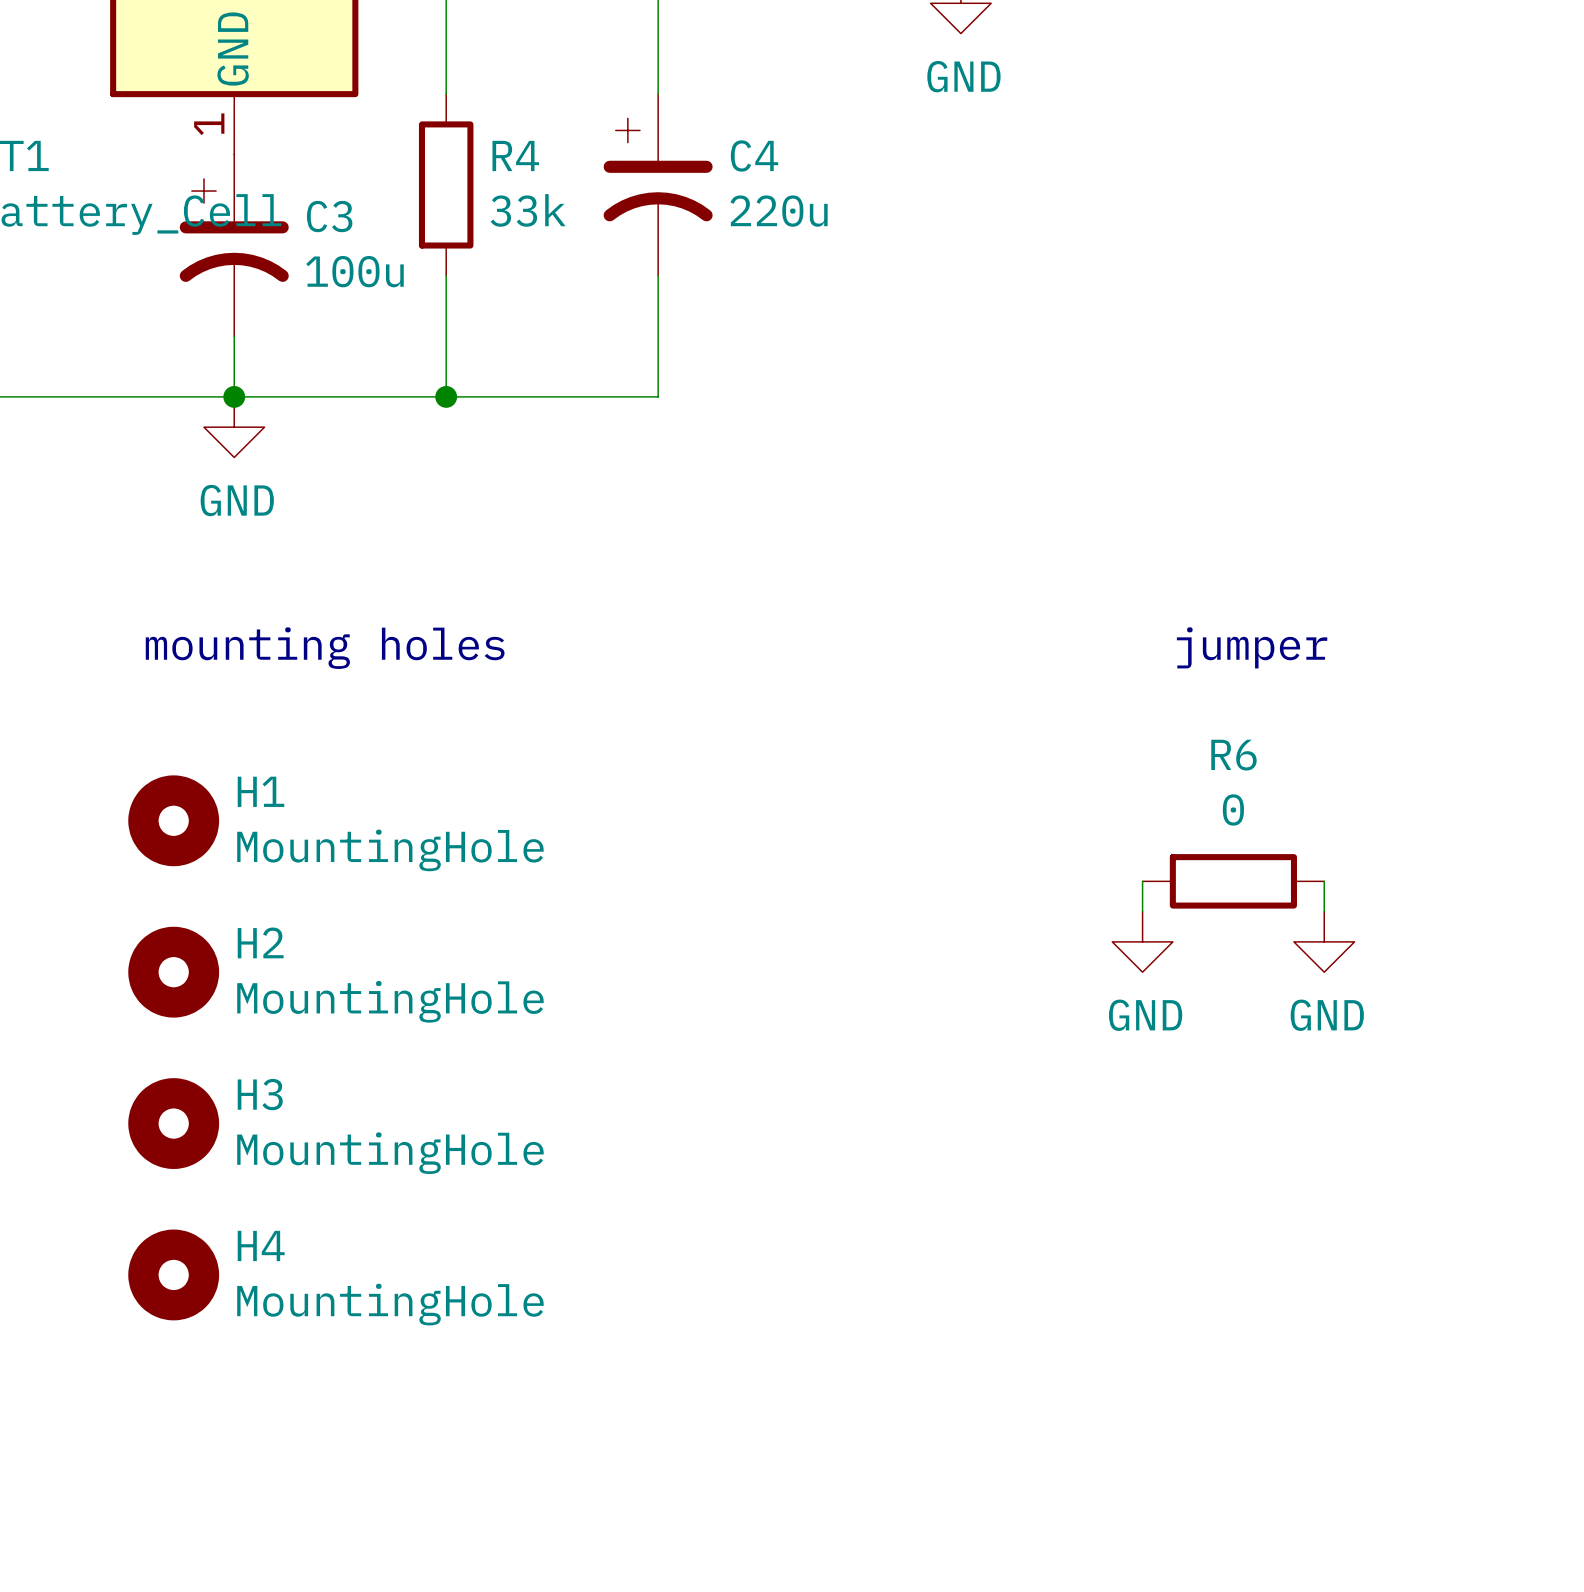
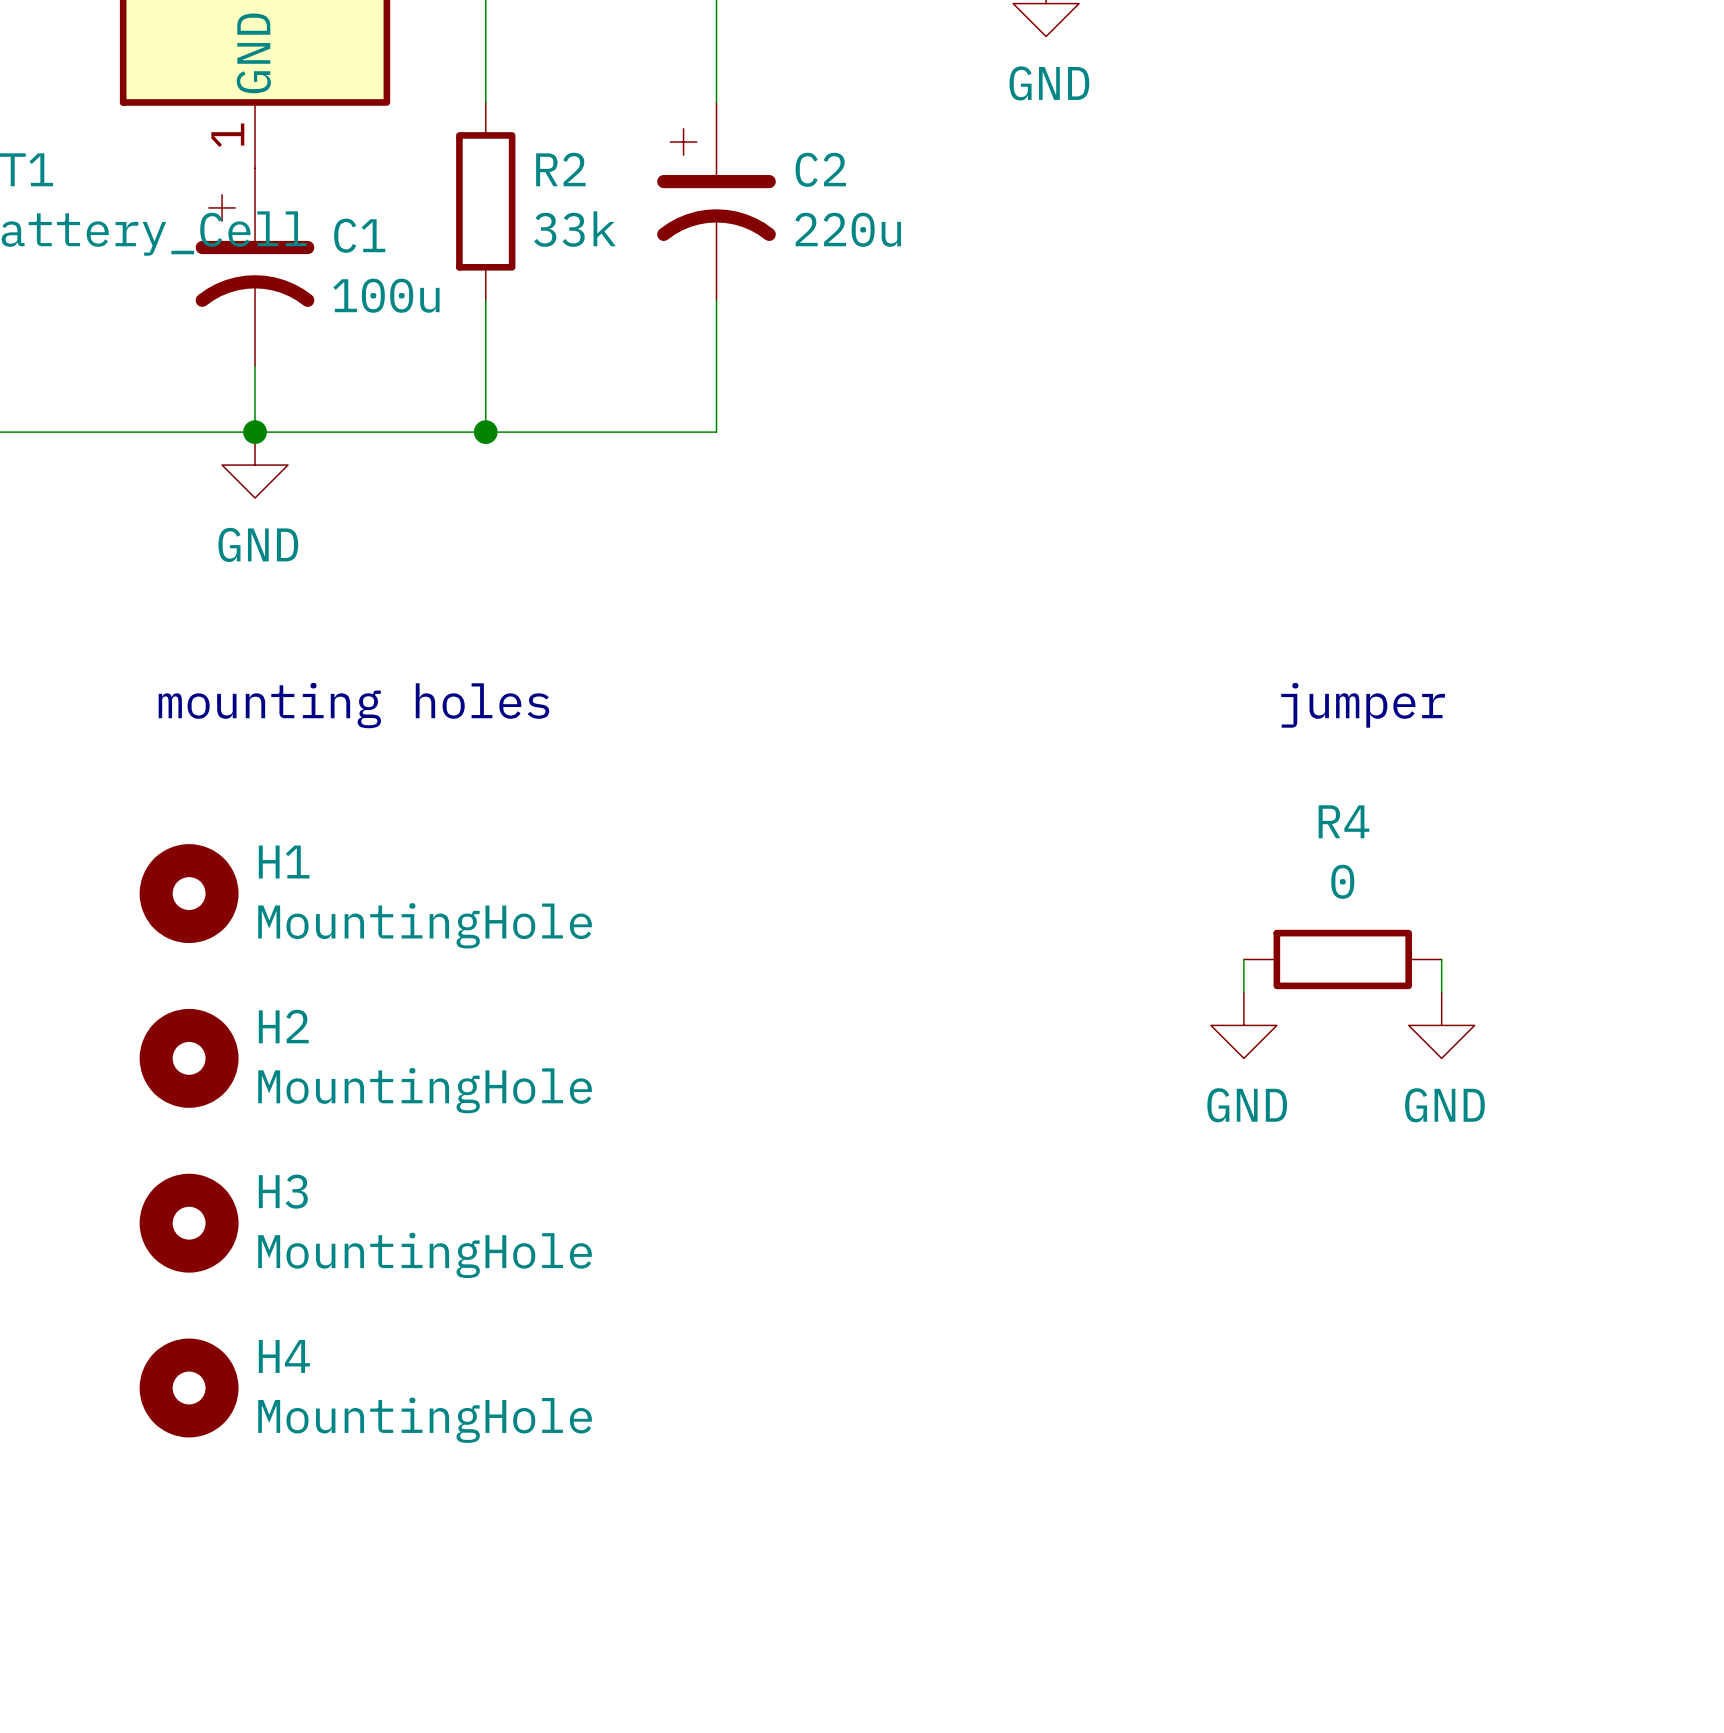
R4 name: R4 (515, 155) -> R2 (560, 169)
C4 name: C4 (754, 155) -> C2 (820, 169)
C3 name: C3 (329, 216) -> C1 (359, 235)
R6 name: R6 (1233, 755) -> R4 (1344, 821)

